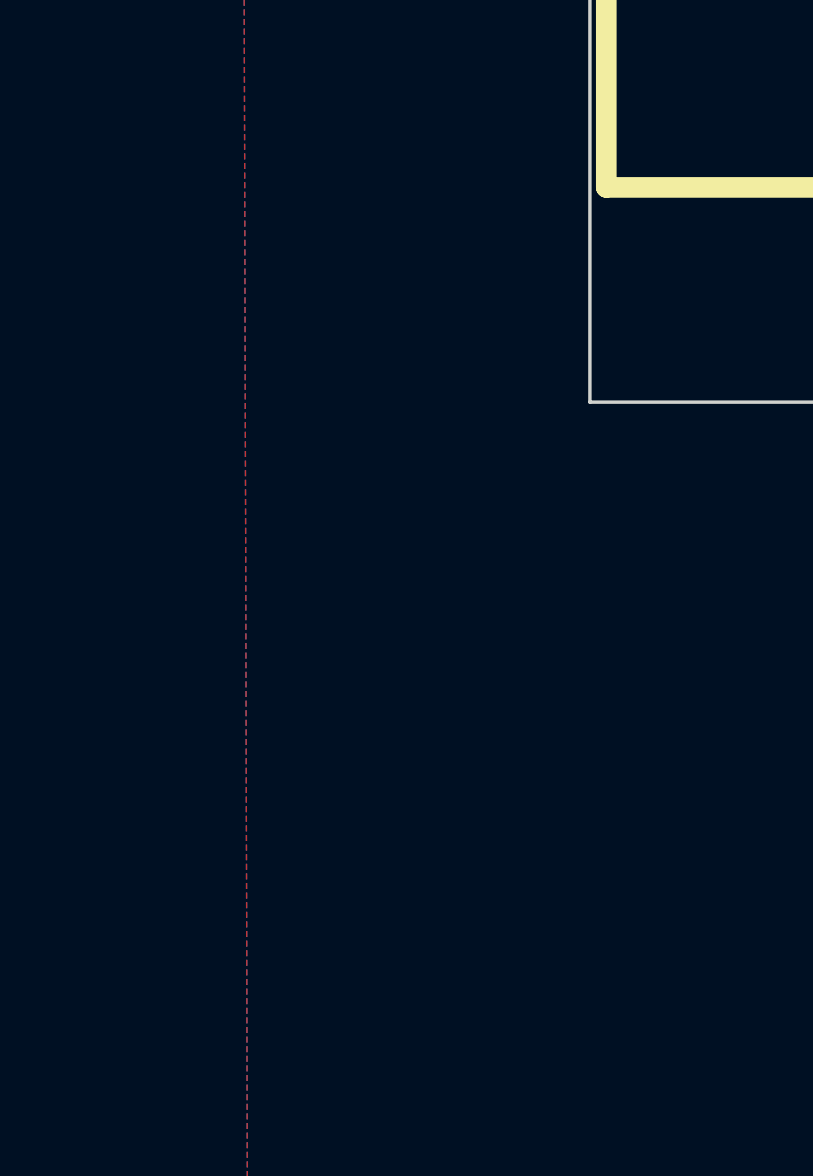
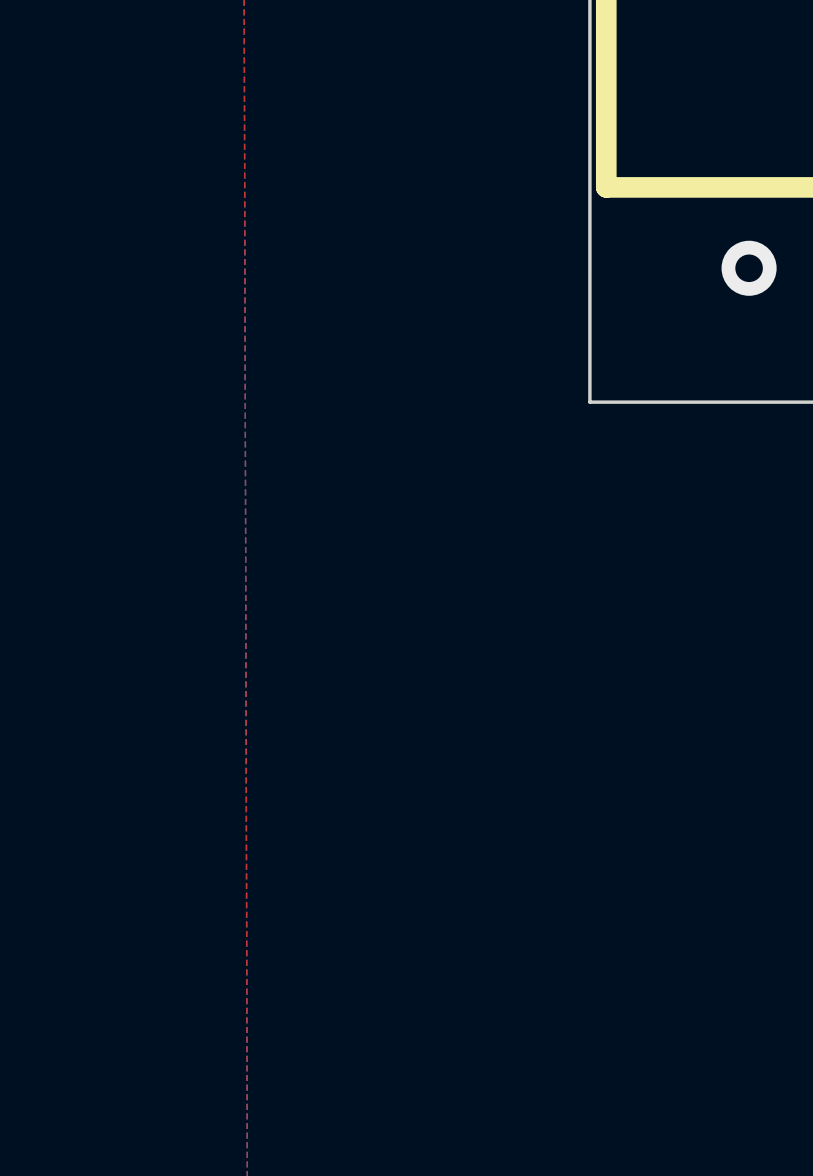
via: none -> (749, 268)

